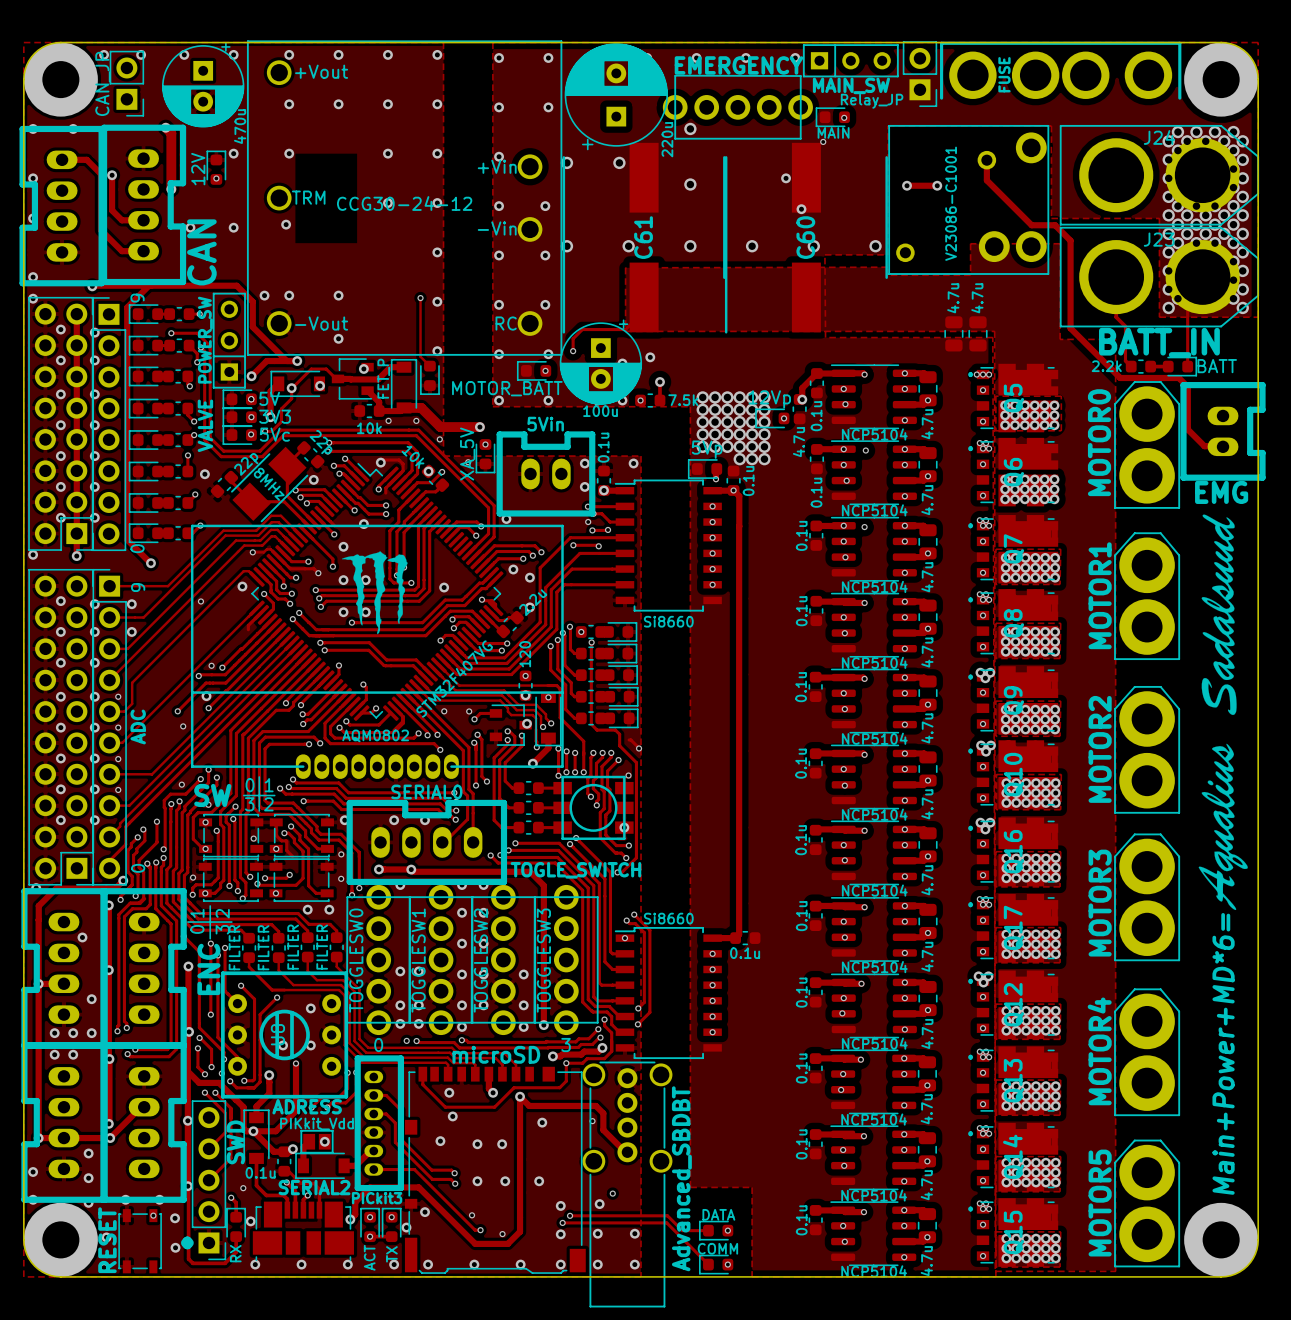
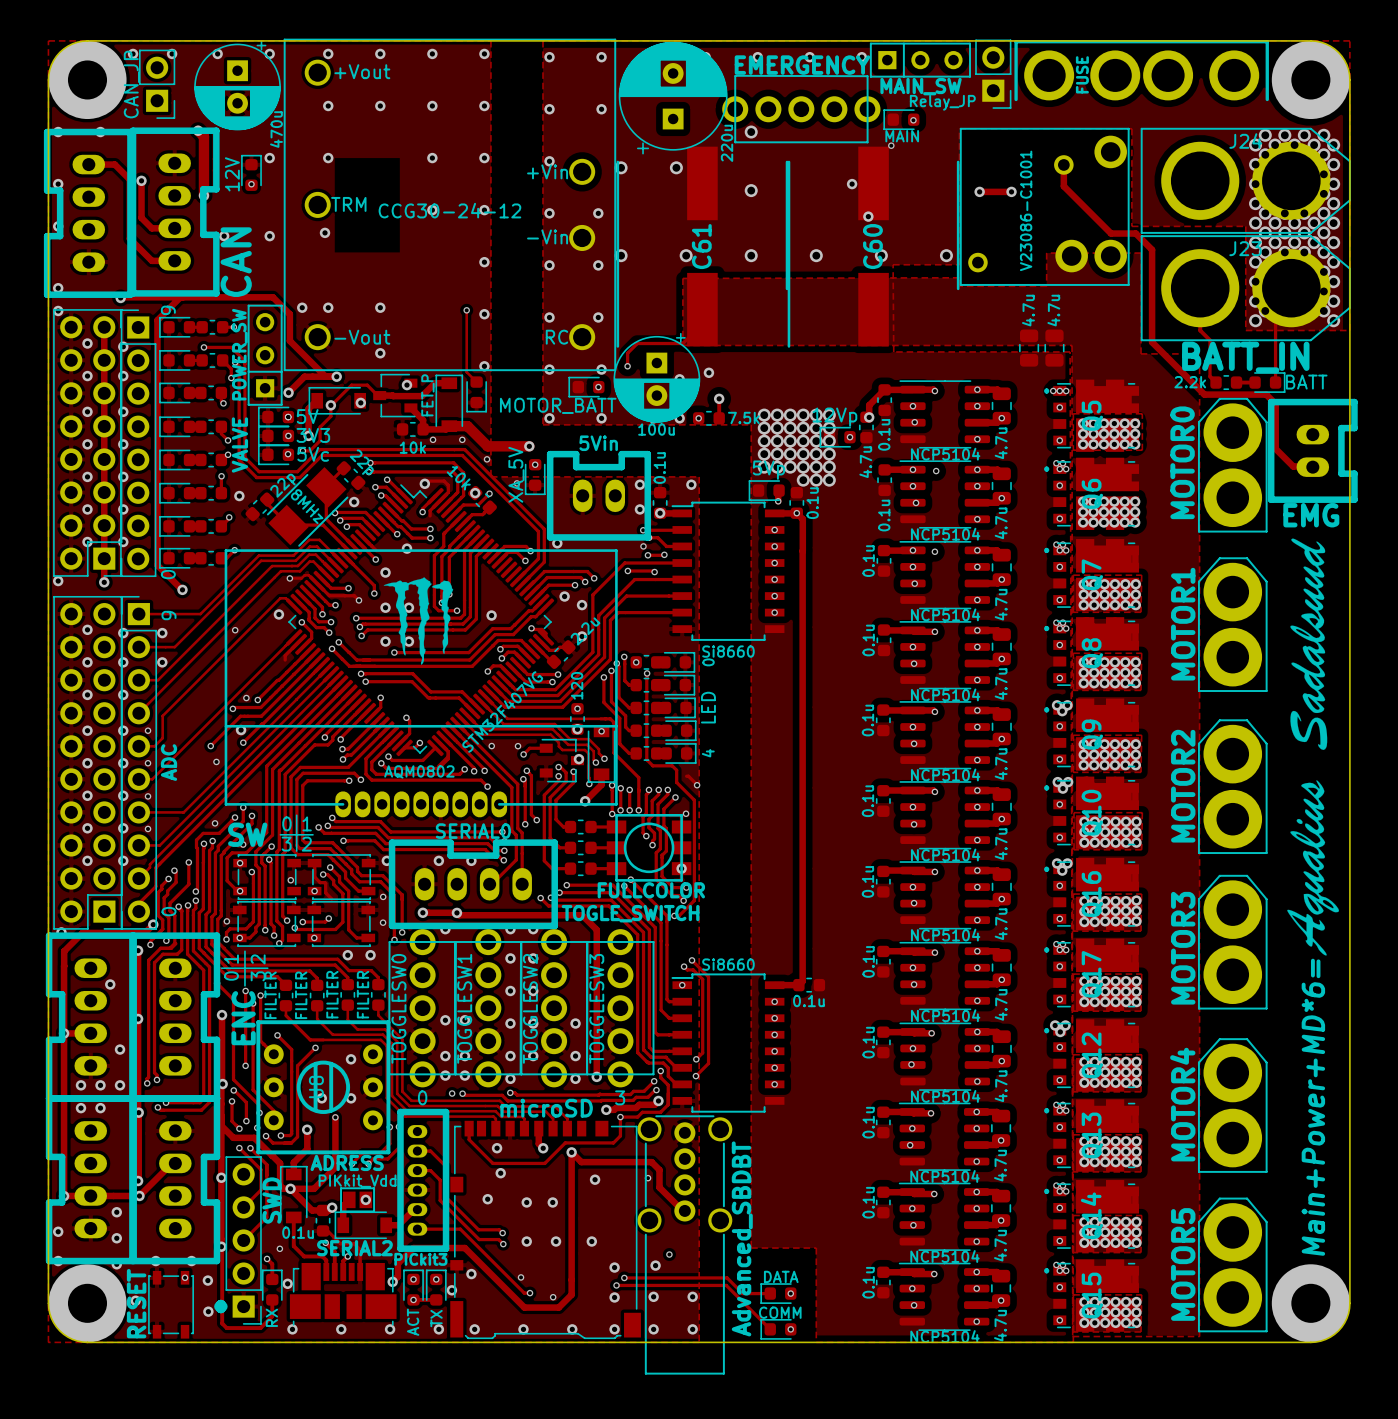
text: none -> 0 (708, 662)
text: none -> LED (708, 707)
text: none -> 4 (708, 753)
text: none -> FULLCOLOR (651, 890)

